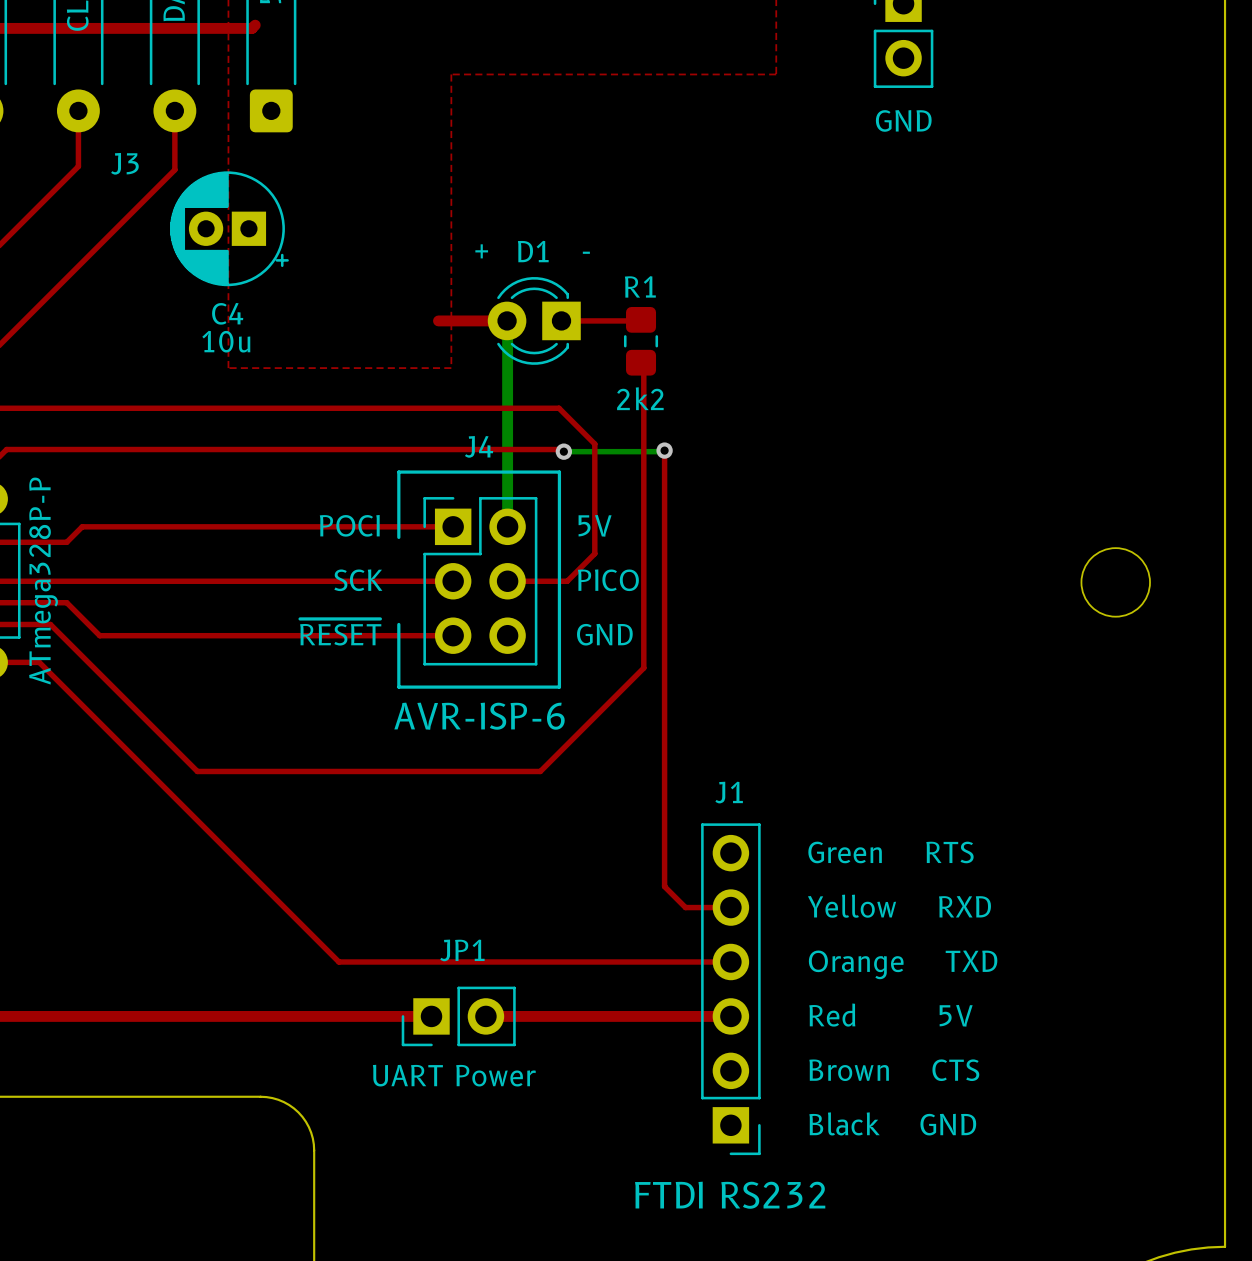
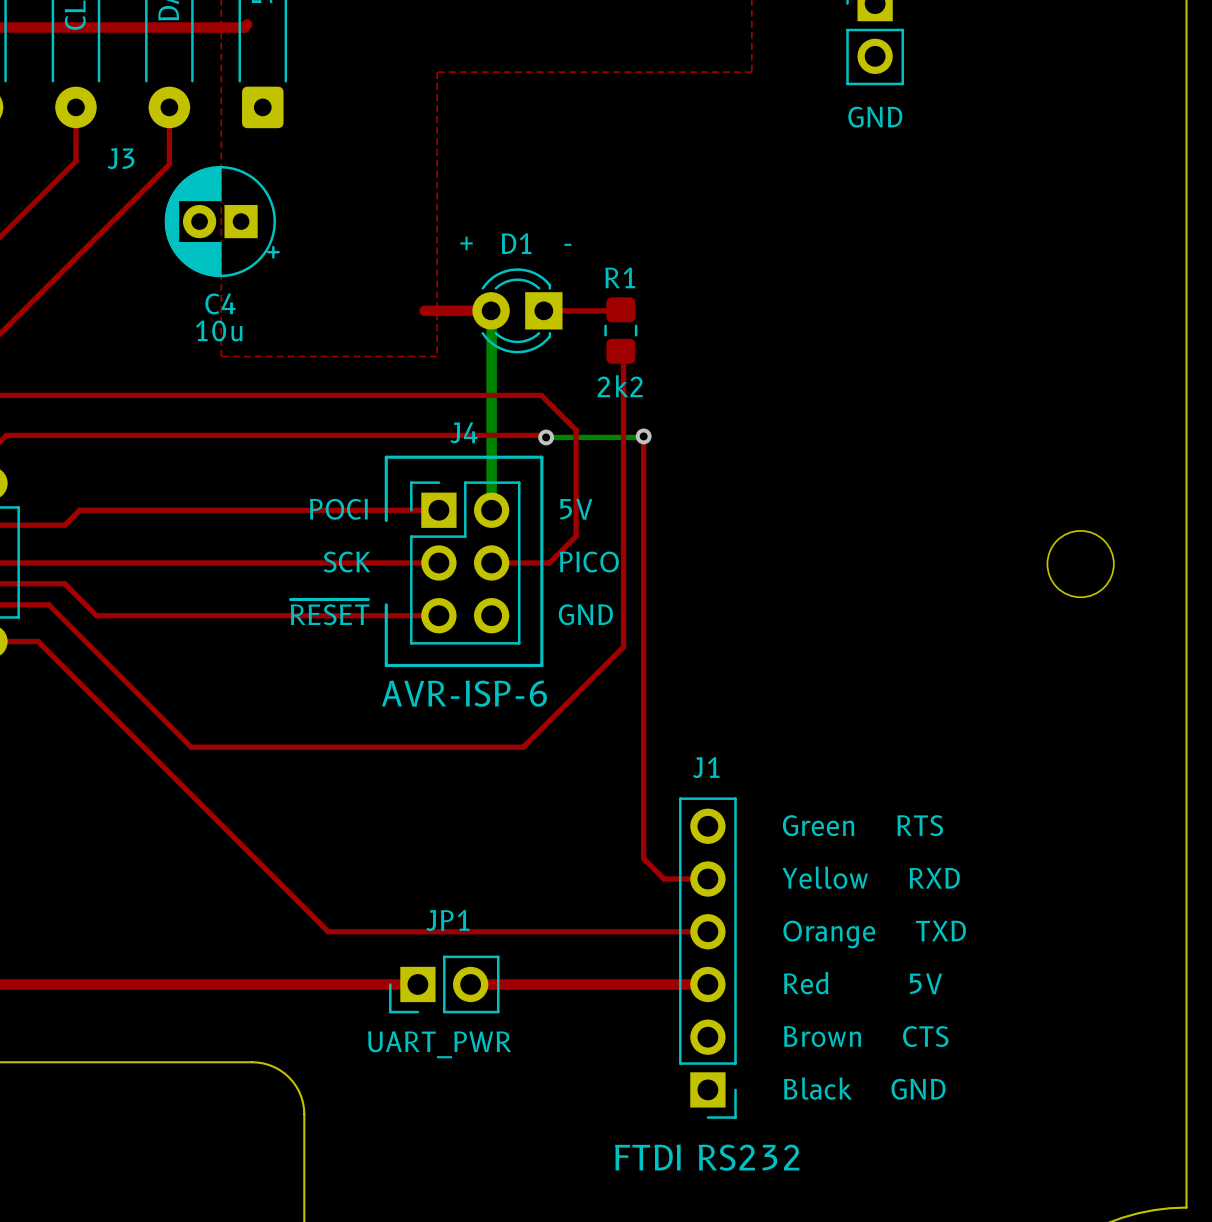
part value: ATmega328P-P (43, 581) -> none
JP1 value: UART Power (454, 1075) -> UART_PWR (439, 1044)

